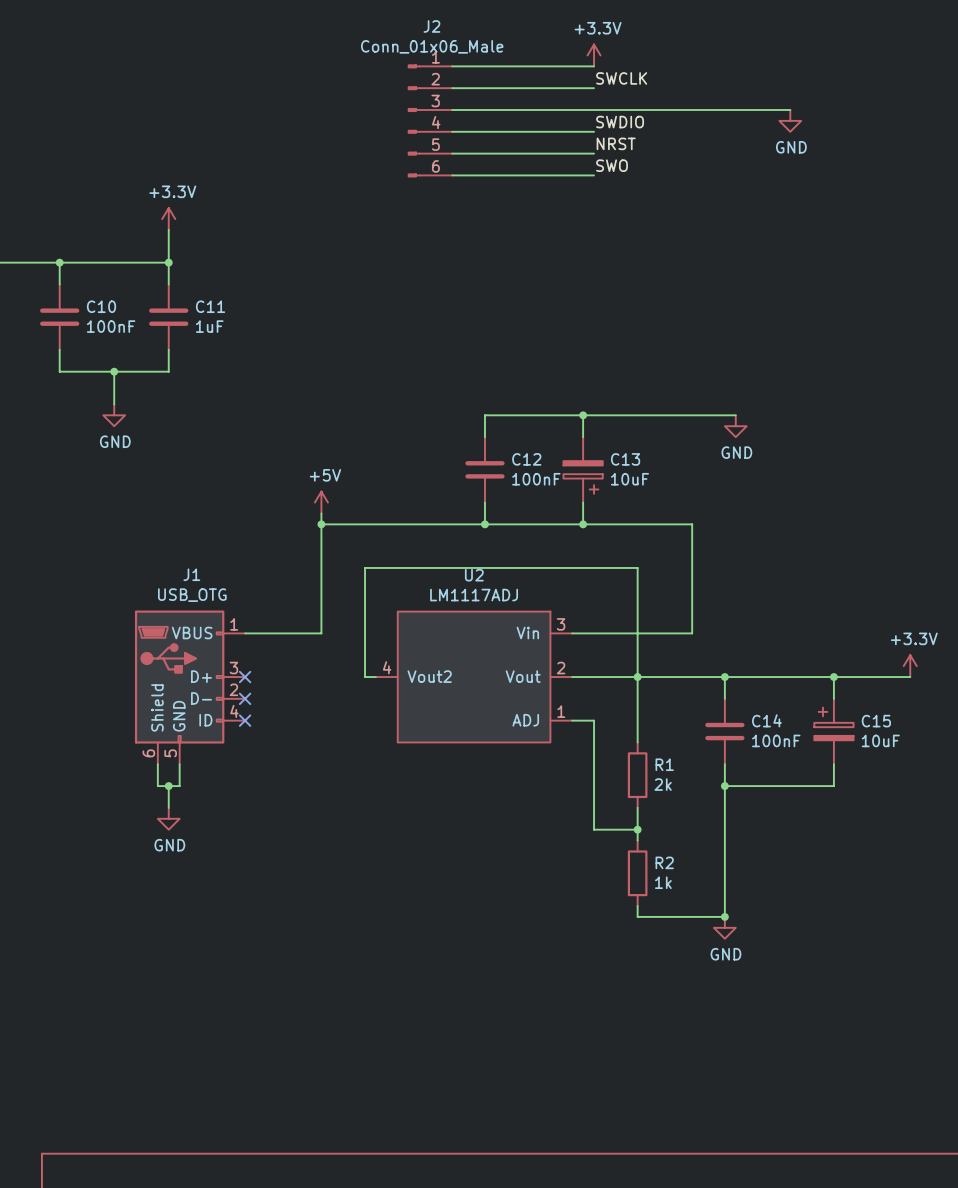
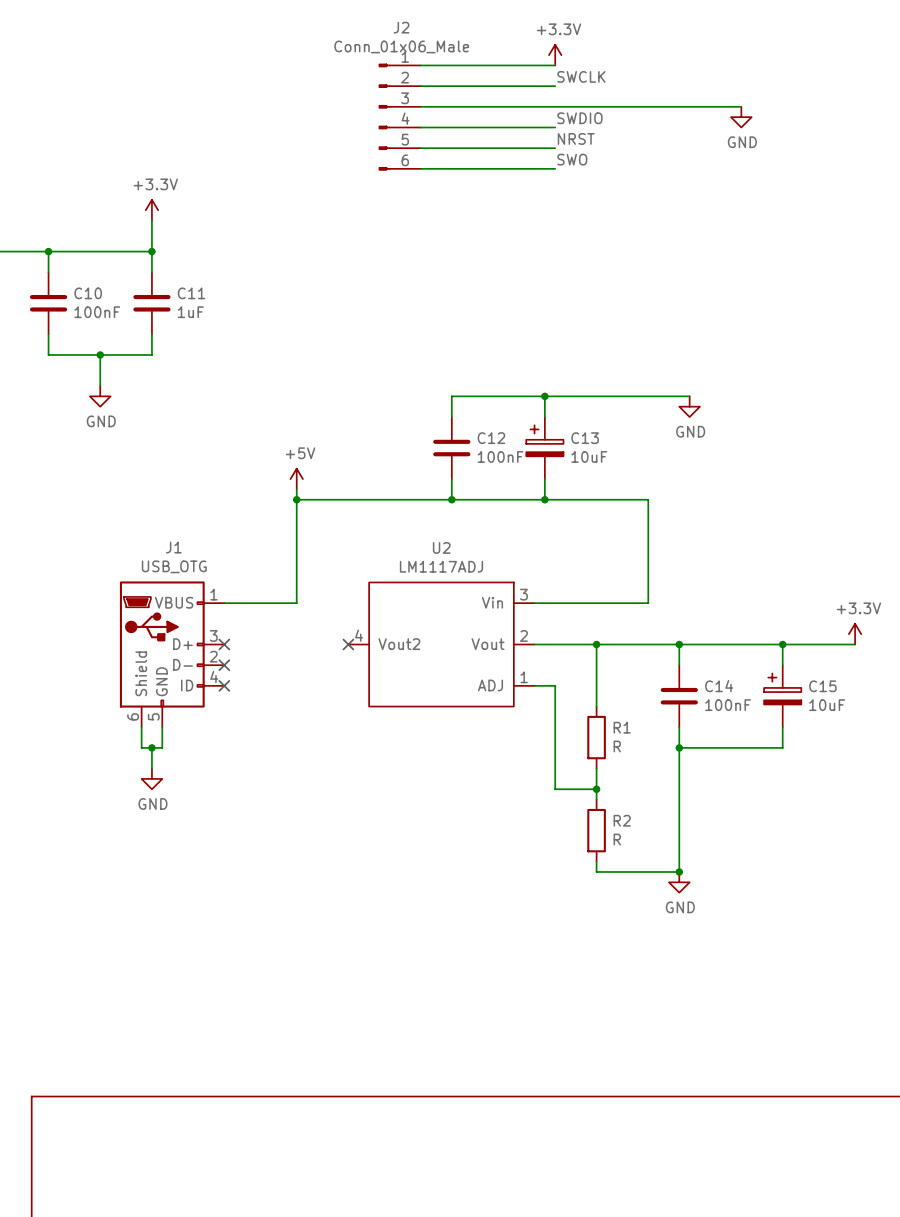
C13 rotation: 0° (583, 477) -> 180° (544, 440)
wire: (375, 677) (365, 677) (365, 567) (637, 567) (637, 677) -> none
no-connect mark: none -> (348, 644)
R1 value: 2k (663, 784) -> R (617, 746)
R2 value: 1k (663, 882) -> R (617, 839)

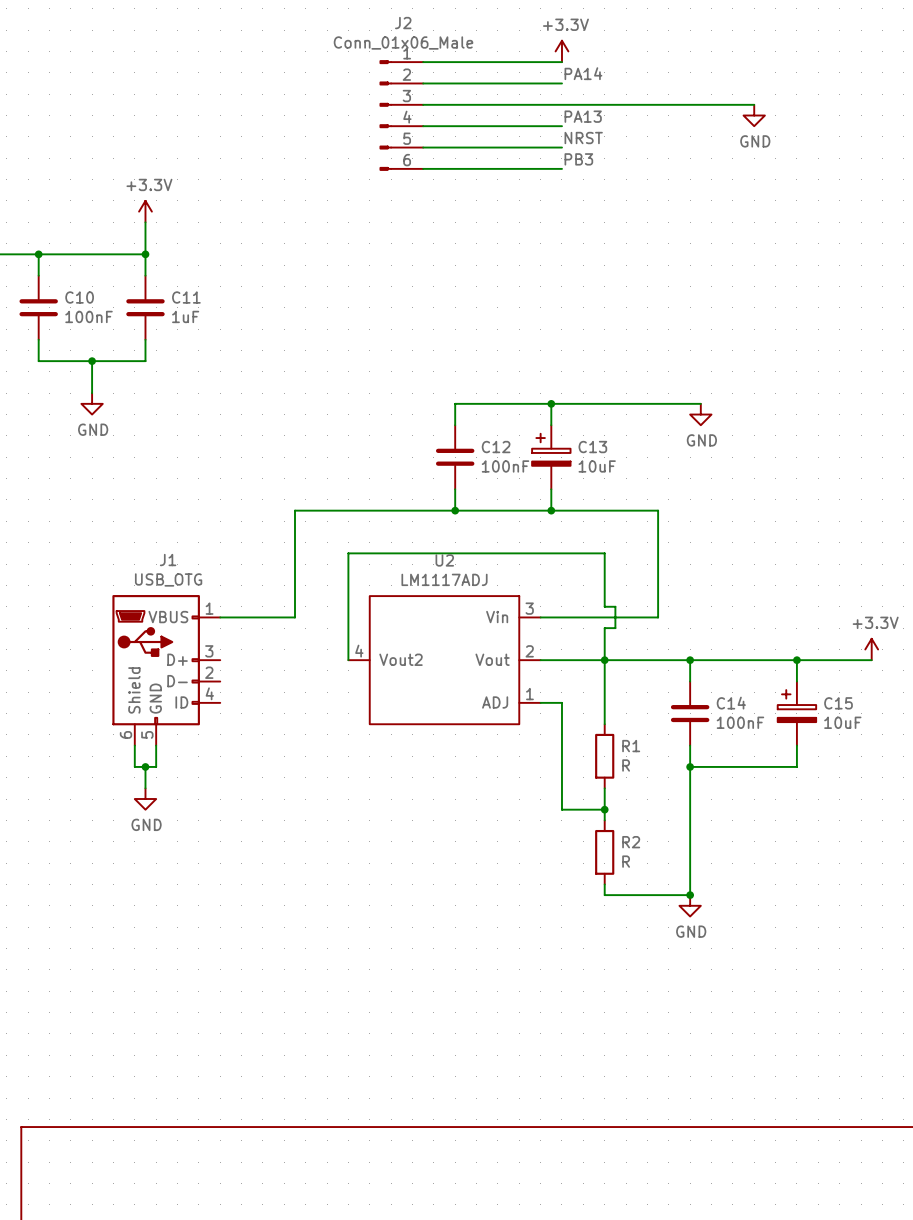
label: SWCLK (581, 76) -> PA14 (583, 73)
label: SWDIO (579, 118) -> PA13 (583, 116)
label: SWO (572, 159) -> PB3 (578, 159)
power symbol: +5V (296, 479) -> none
wire: (296, 489) (296, 499) -> none
junction: (296, 499) -> none
no-connect mark: (224, 644) -> none
wire: none -> (348, 660) (348, 553) (604, 553) (604, 606) (615, 606) (615, 628) (604, 628) (604, 660)
no-connect mark: (348, 644) -> none
no-connect mark: (224, 665) -> none
no-connect mark: (224, 685) -> none

